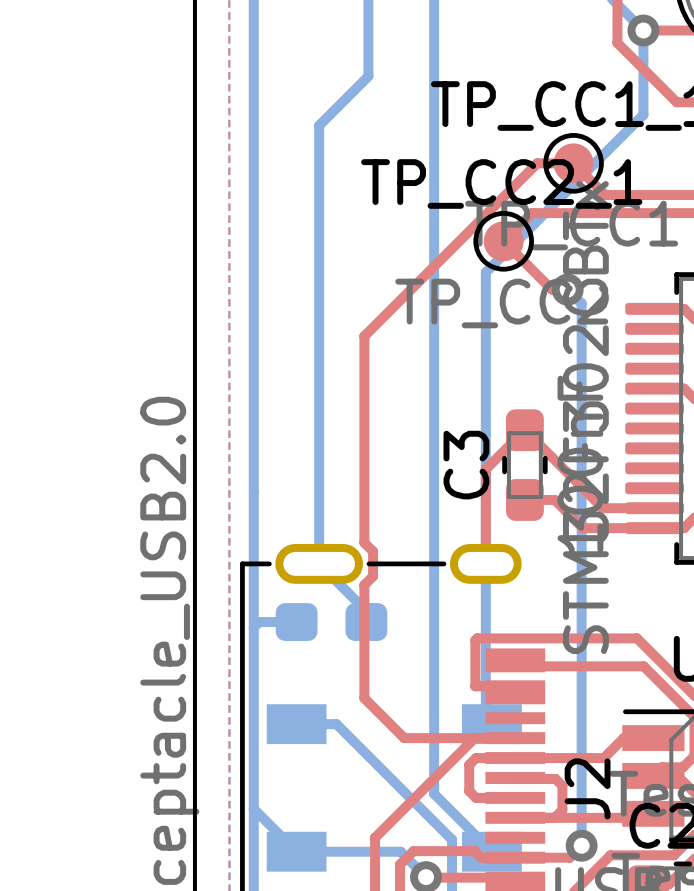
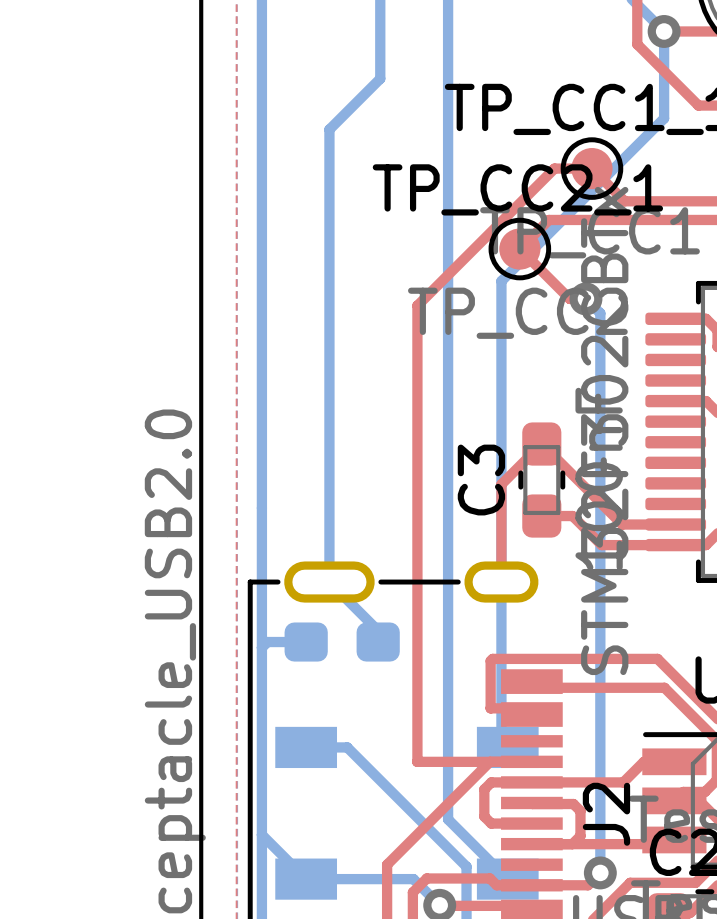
top track: (404, 296) (364, 336) (364, 542) (373, 551) (373, 576) (364, 585) (364, 698) (404, 738) -> (417, 305) (417, 761)

